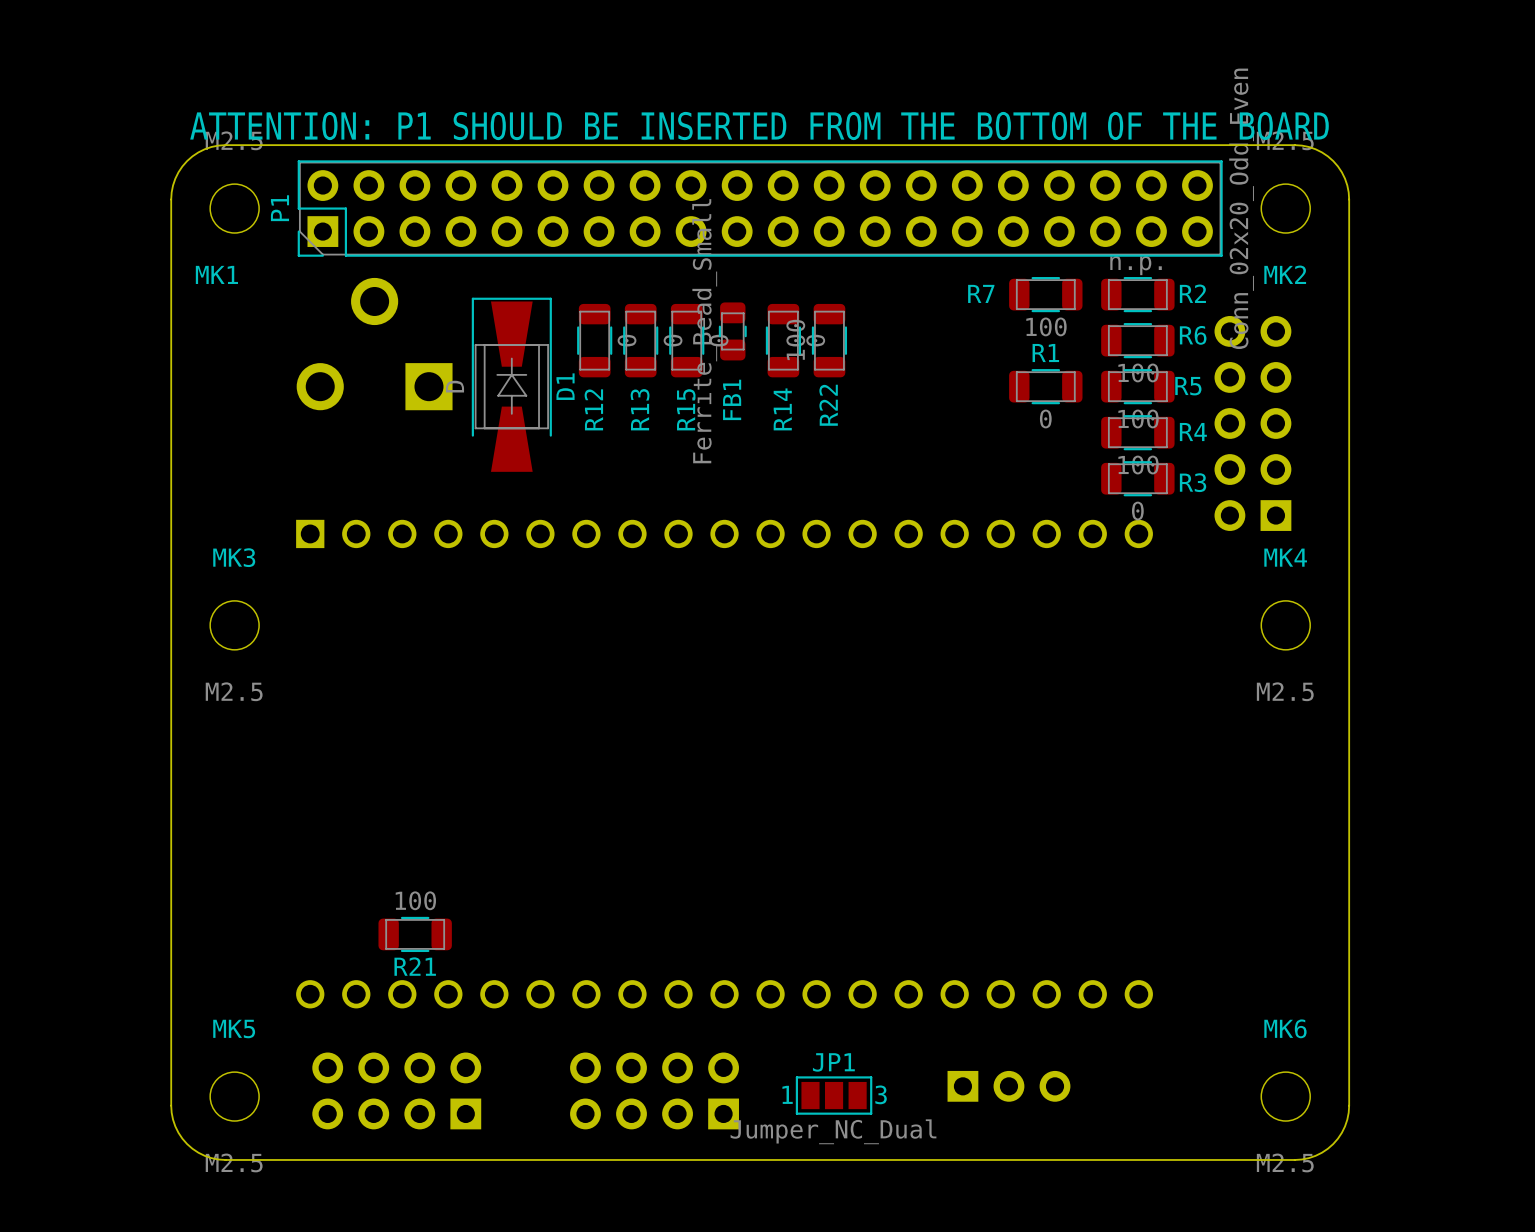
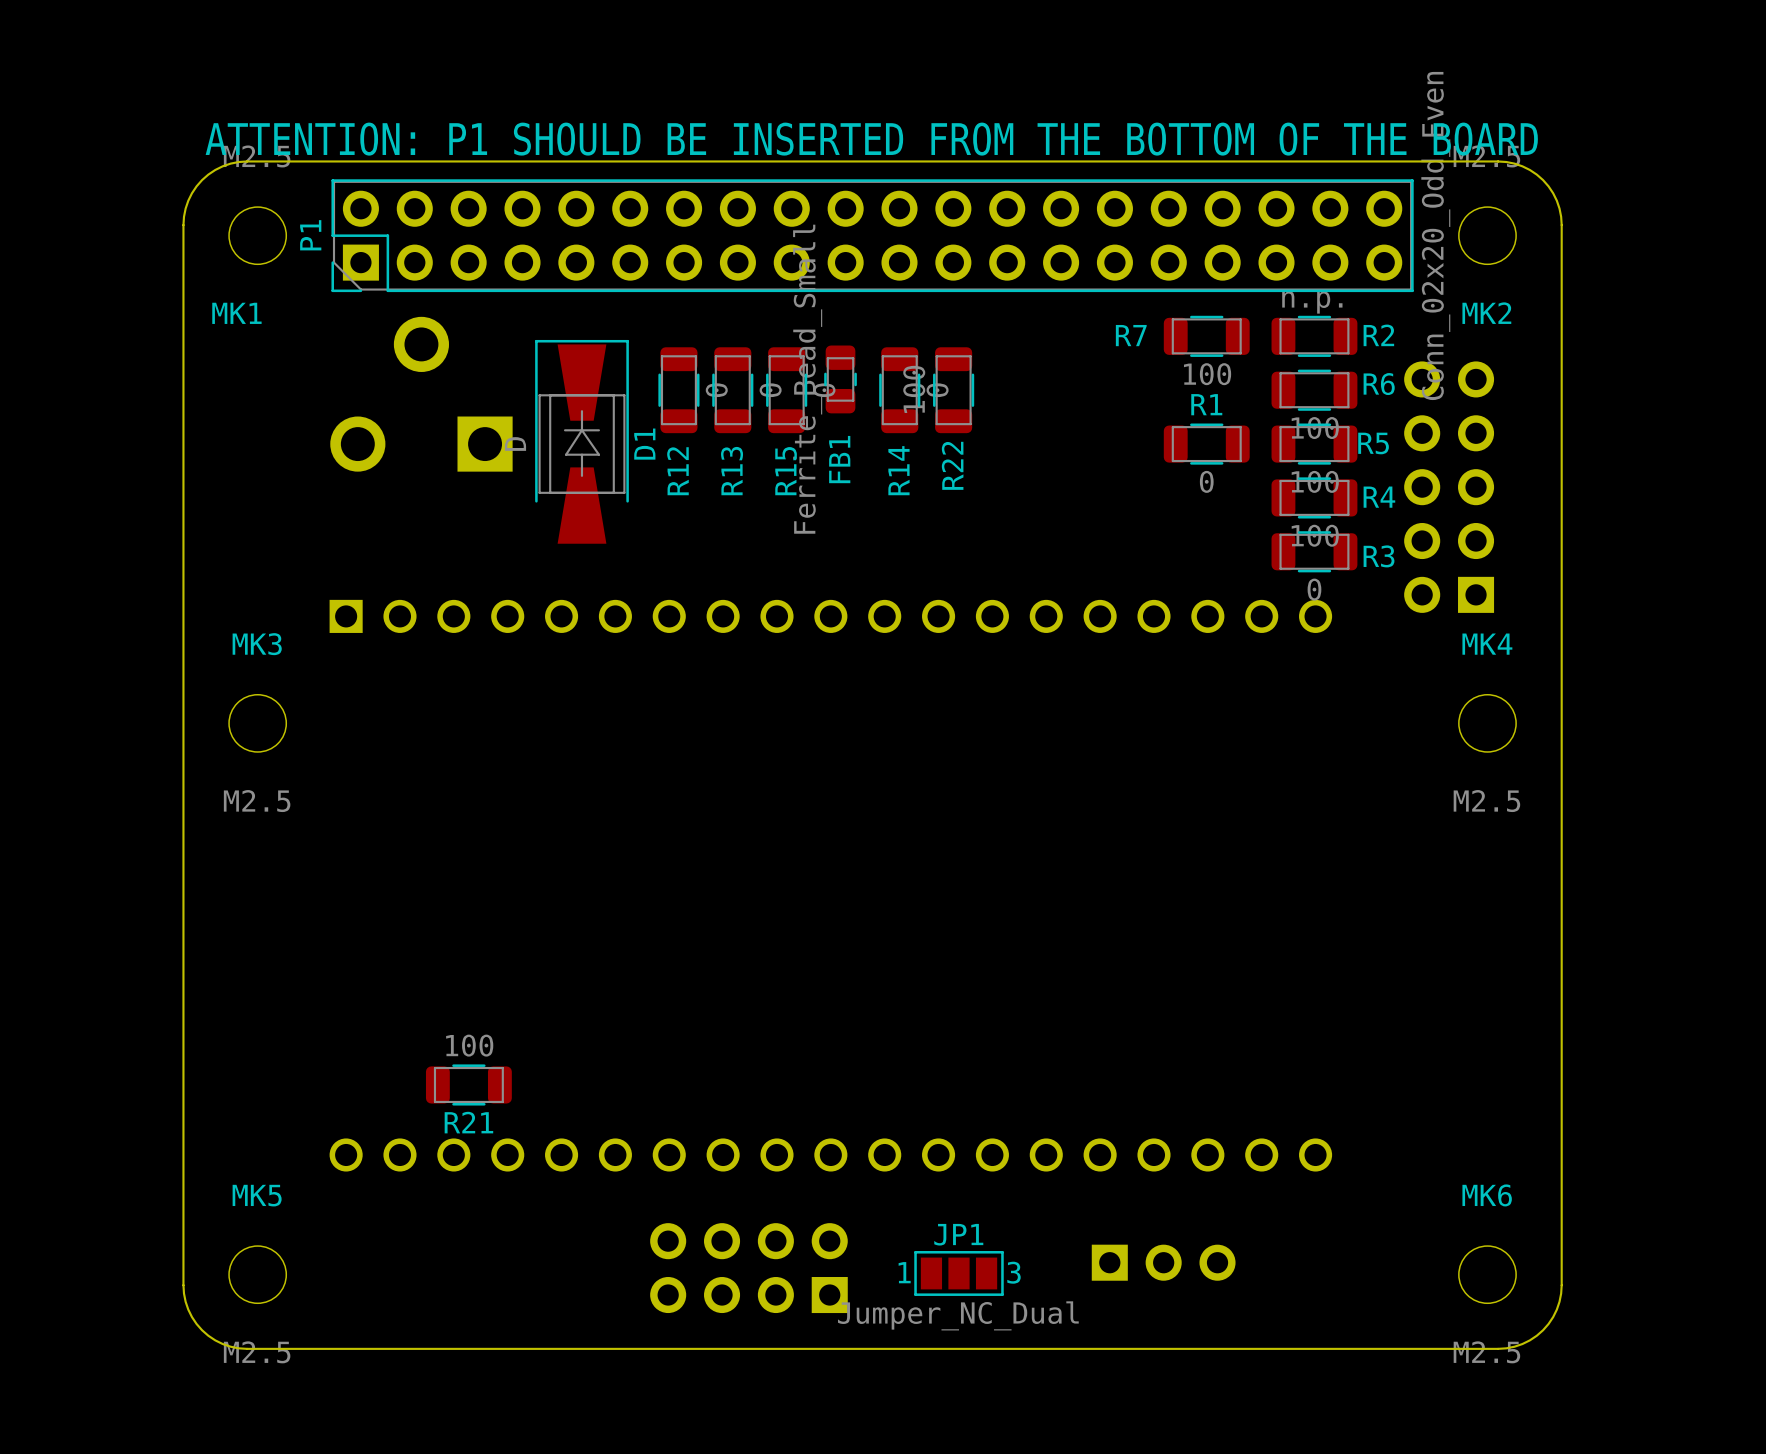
part: (396, 1090) -> none

